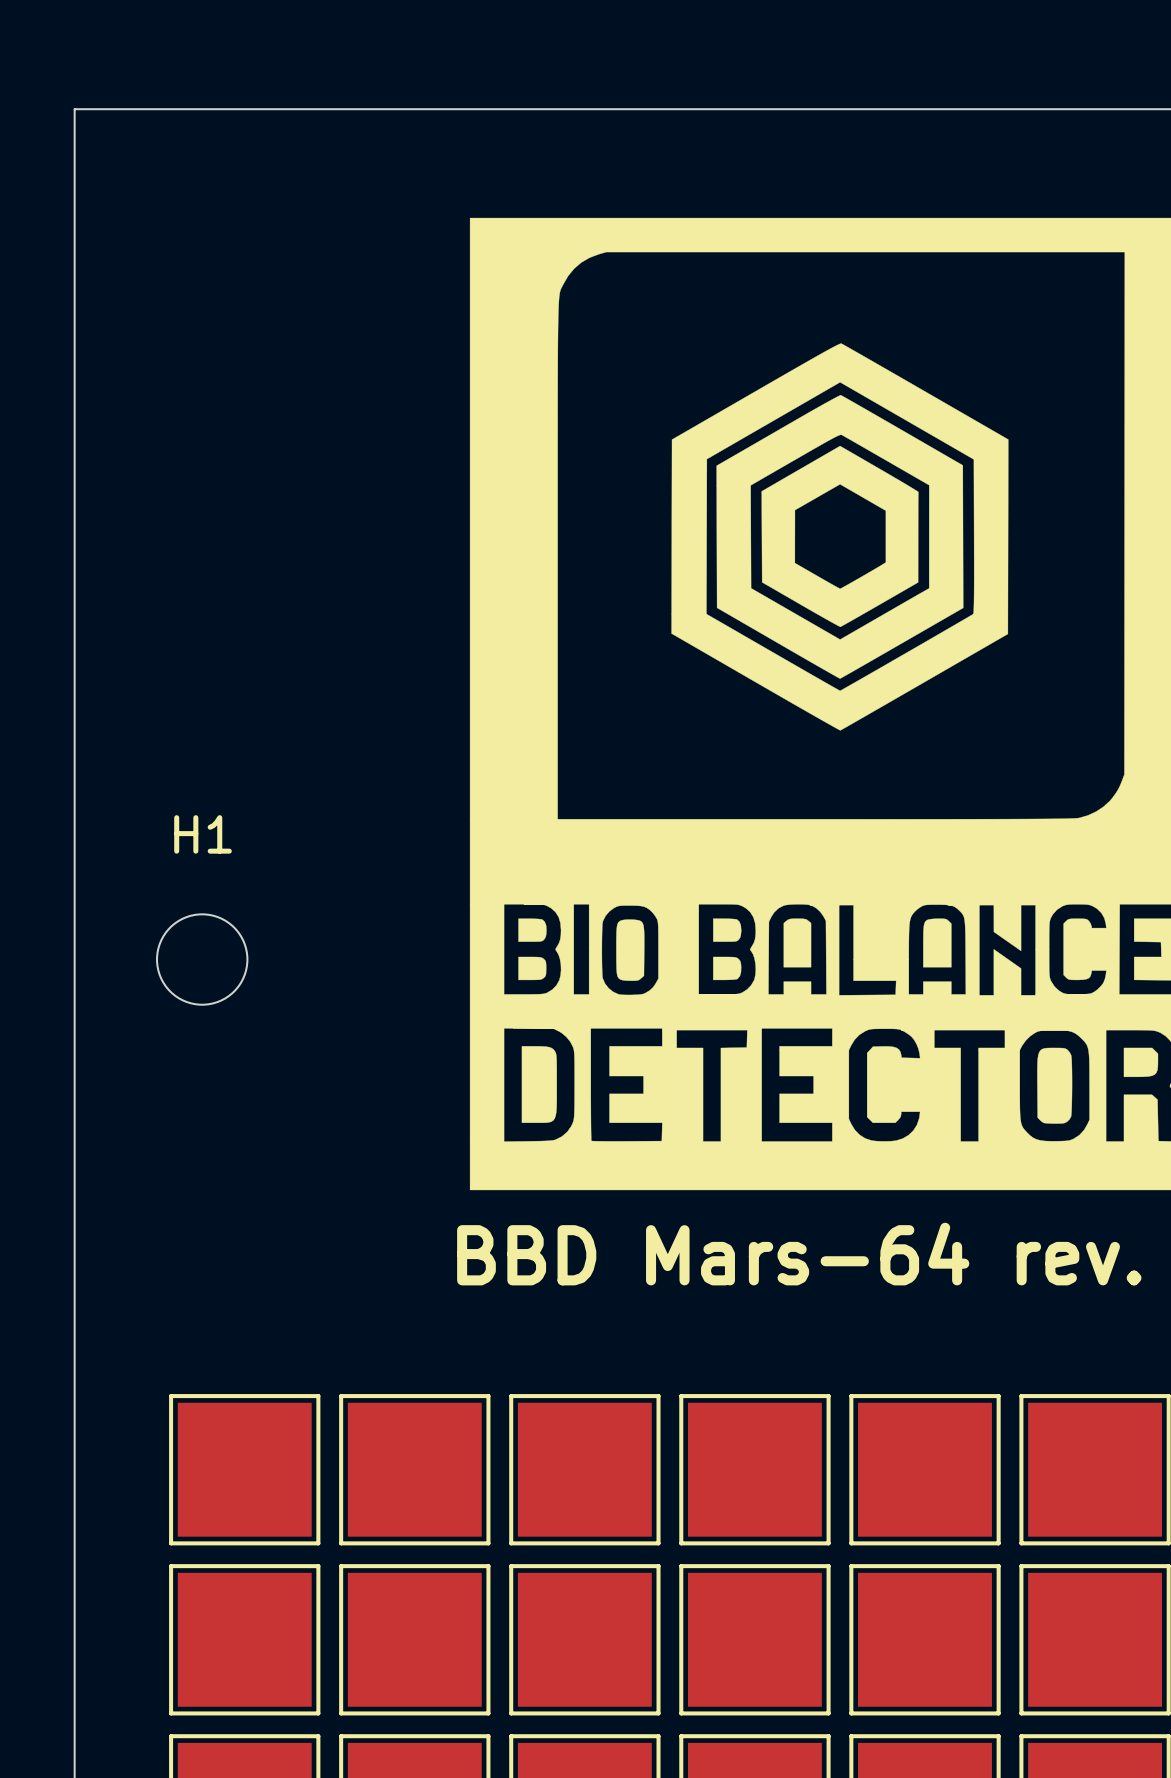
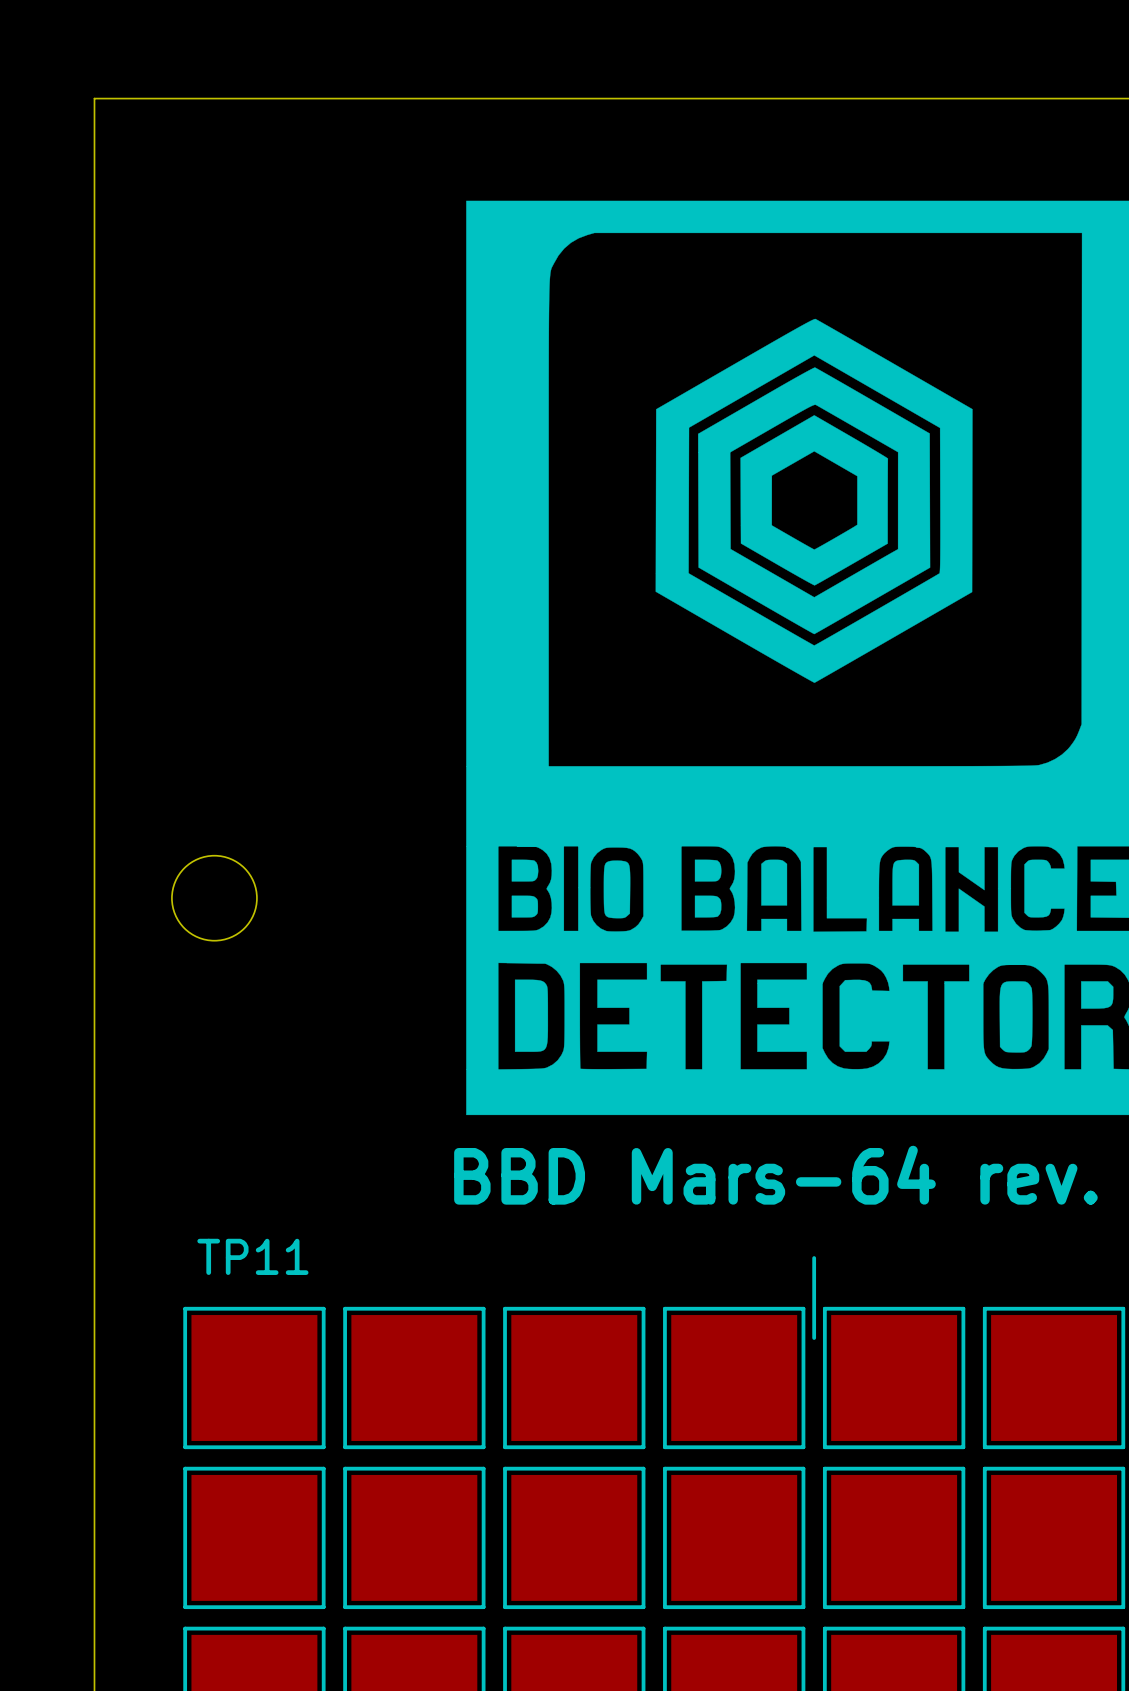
H1 name: H1 (203, 834) -> none
text: none -> TP11 (252, 1256)
line: none -> (814, 1258) (814, 1338)

